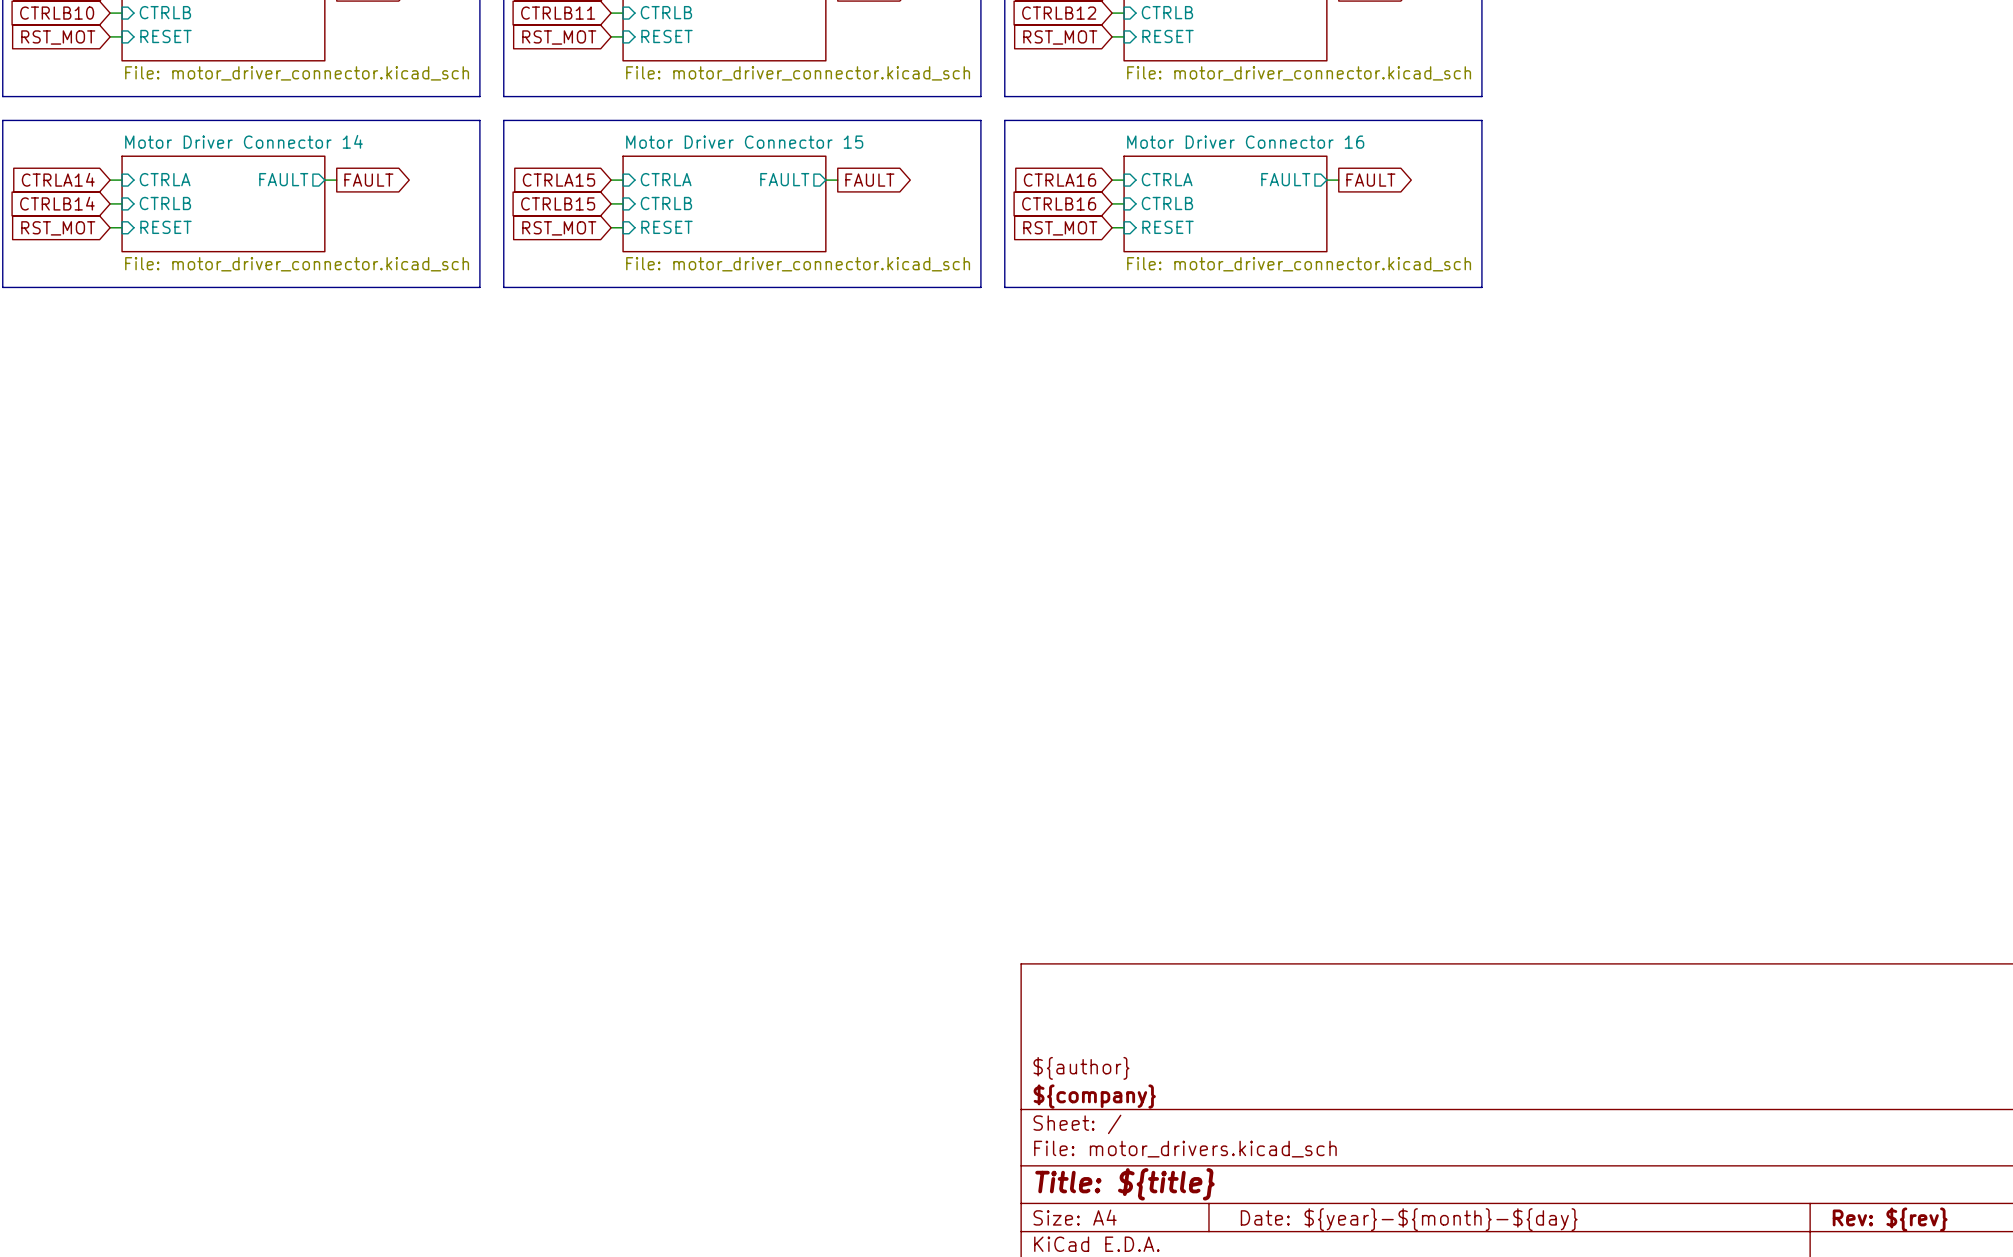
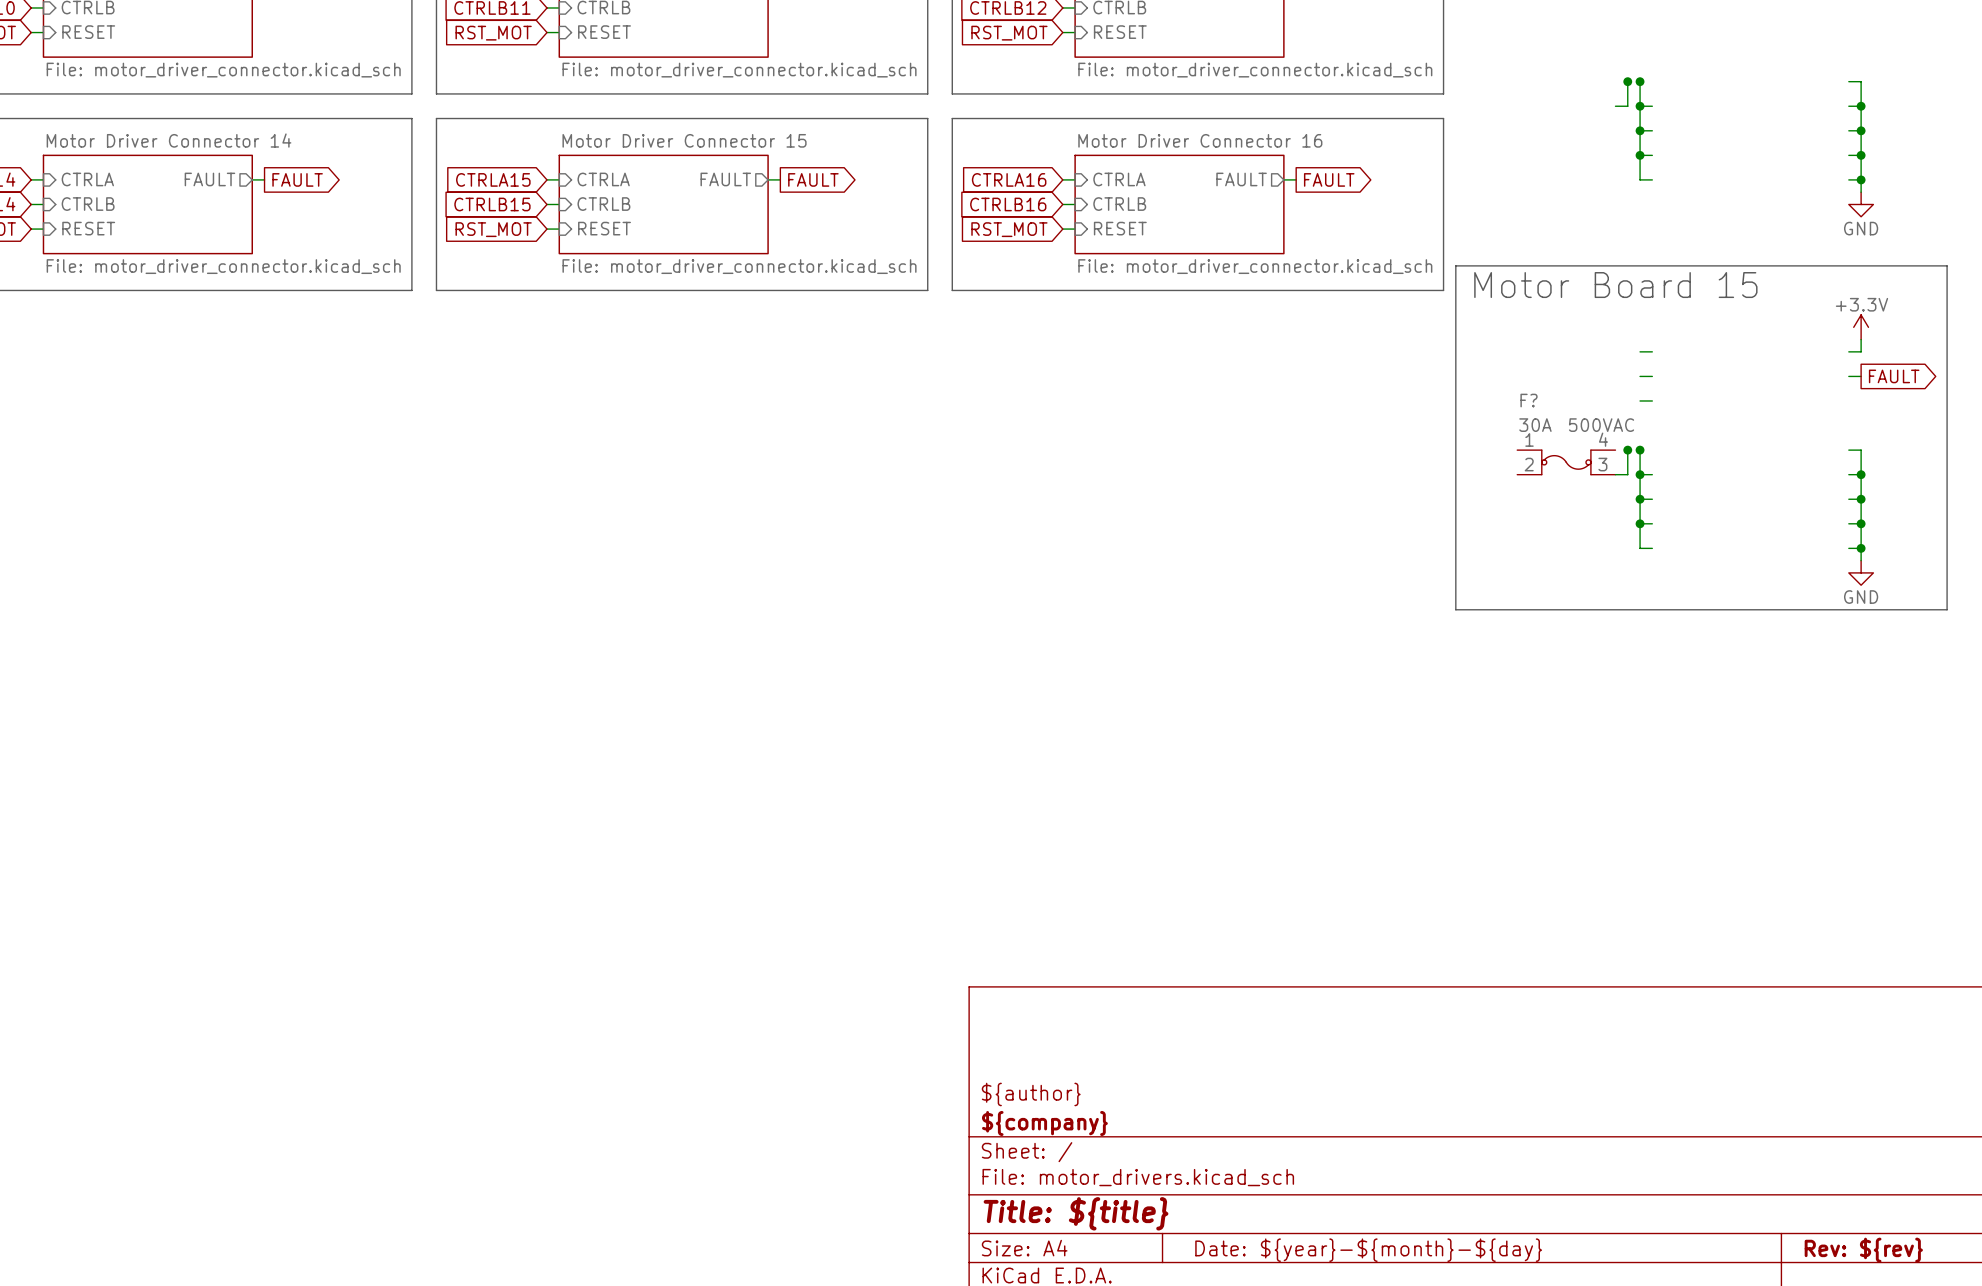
wire: none -> (1627, 81) (1627, 106) (1615, 106)
junction: none -> (1627, 81)
wire: none -> (1640, 81) (1640, 179) (1652, 179)
junction: none -> (1640, 81)
wire: none -> (1848, 81) (1861, 81) (1861, 192)
wire: none -> (1640, 106) (1652, 106)
junction: none -> (1640, 106)
wire: none -> (1848, 106) (1861, 106)
junction: none -> (1861, 106)
wire: none -> (1640, 130) (1652, 130)
junction: none -> (1640, 130)
wire: none -> (1848, 130) (1861, 130)
junction: none -> (1861, 130)
wire: none -> (1640, 155) (1652, 155)
junction: none -> (1640, 155)
wire: none -> (1848, 155) (1861, 155)
junction: none -> (1861, 155)
wire: none -> (1848, 179) (1861, 179)
junction: none -> (1861, 179)
power symbol: none -> GND (1861, 204)
line: none -> (1455, 265) (1947, 265) (1947, 609) (1455, 609) (1455, 265)
text: none -> Motor Board 15 (1615, 285)
power symbol: none -> +3.3V (1861, 327)
wire: none -> (1861, 339) (1861, 351) (1848, 351)
wire: none -> (1640, 351) (1652, 351)
wire: none -> (1640, 376) (1652, 376)
wire: none -> (1848, 376) (1861, 376)
global label: none -> FAULT (1894, 376)
wire: none -> (1640, 400) (1652, 400)
wire: none -> (1627, 450) (1627, 474) (1615, 474)
junction: none -> (1627, 450)
wire: none -> (1640, 450) (1640, 548) (1652, 548)
junction: none -> (1640, 450)
wire: none -> (1848, 450) (1861, 450) (1861, 560)
F?: none -> (1566, 462)
wire: none -> (1640, 474) (1652, 474)
junction: none -> (1640, 474)
wire: none -> (1848, 474) (1861, 474)
junction: none -> (1861, 474)
wire: none -> (1640, 499) (1652, 499)
junction: none -> (1640, 499)
wire: none -> (1848, 499) (1861, 499)
junction: none -> (1861, 499)
wire: none -> (1640, 523) (1652, 523)
junction: none -> (1640, 523)
wire: none -> (1848, 523) (1861, 523)
junction: none -> (1861, 523)
wire: none -> (1848, 548) (1861, 548)
junction: none -> (1861, 548)
power symbol: none -> GND (1861, 572)

